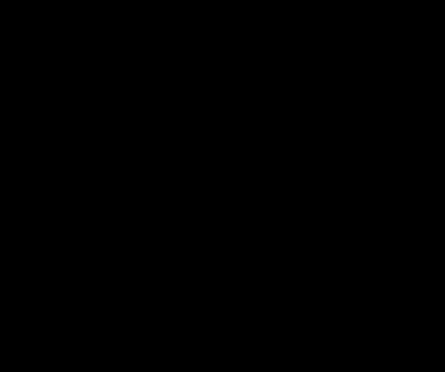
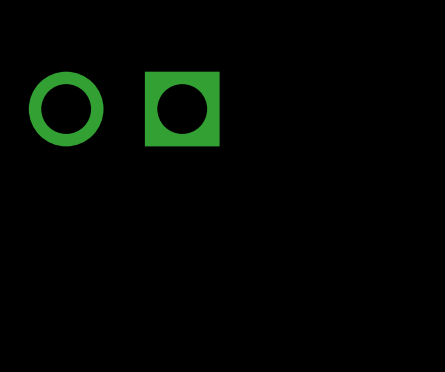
part: none -> (124, 109)

